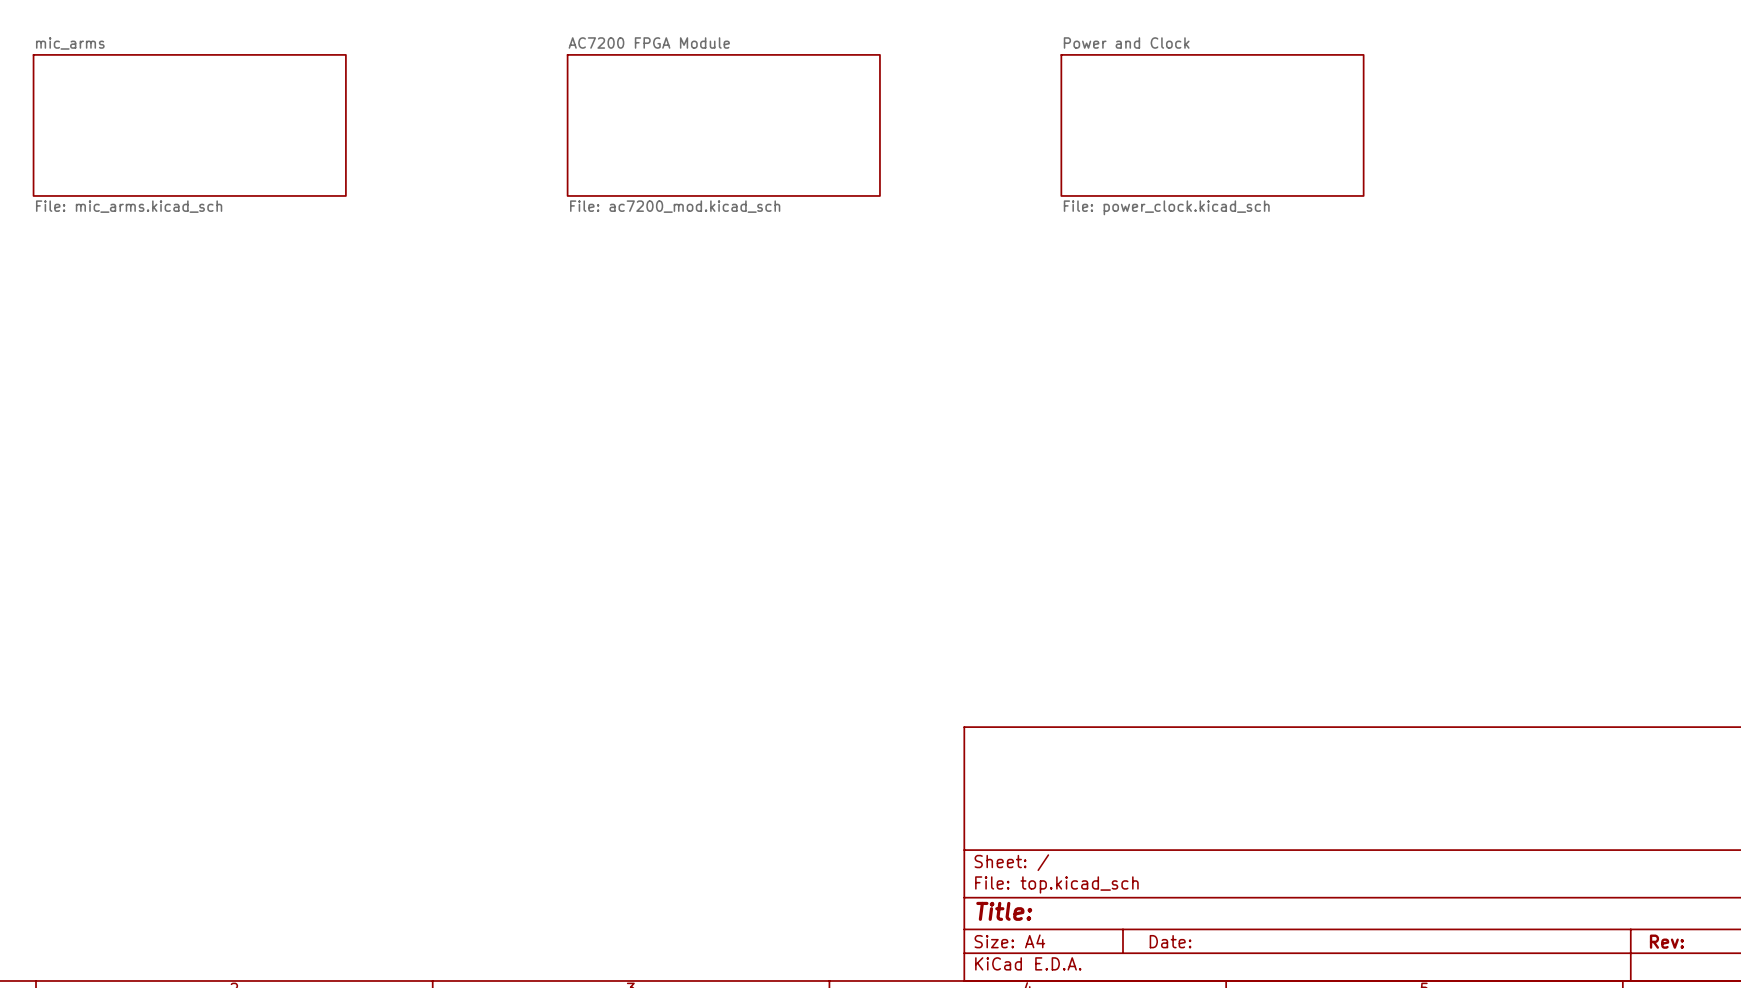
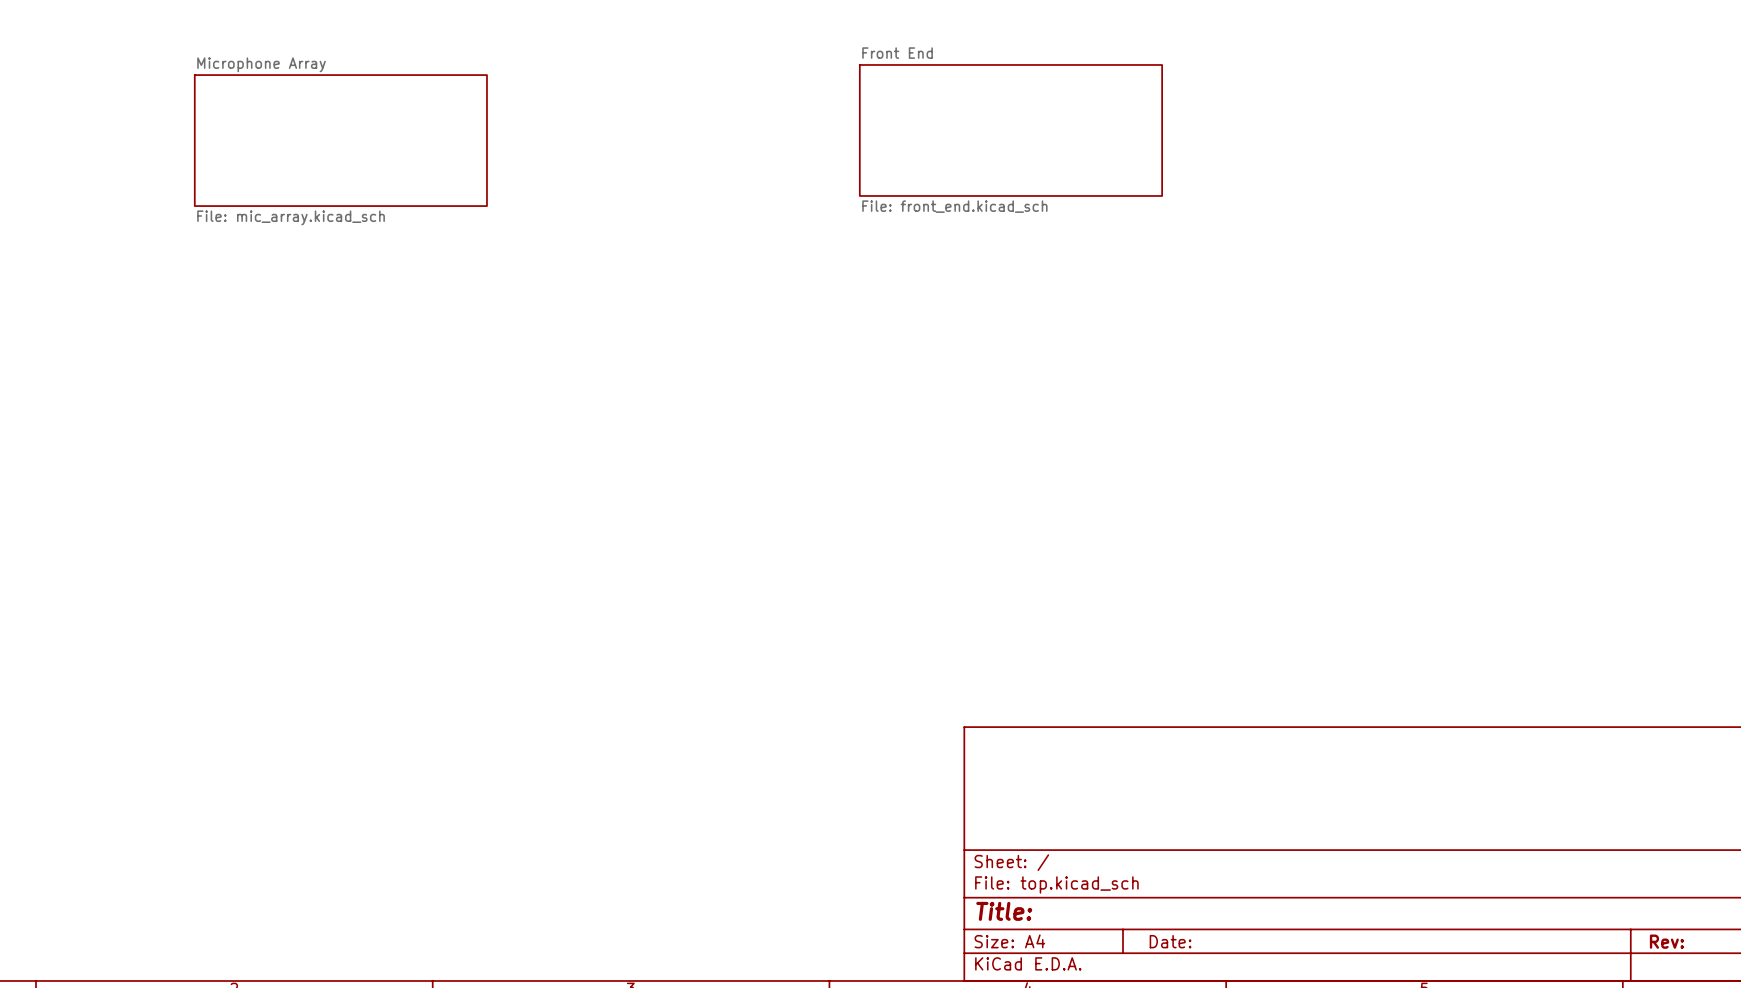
sheet mic_arms: File: mic_arms.kicad_sch (189, 125) -> none
sheet AC7200 FPGA Module: File: ac7200_mod.kicad_sch (723, 125) -> none
sheet Power and Clock: File: power_clock.kicad_sch (1212, 125) -> none
sheet Front End: none -> File: front_end.kicad_sch (1010, 130)
sheet Microphone Array: none -> File: mic_array.kicad_sch (340, 140)

